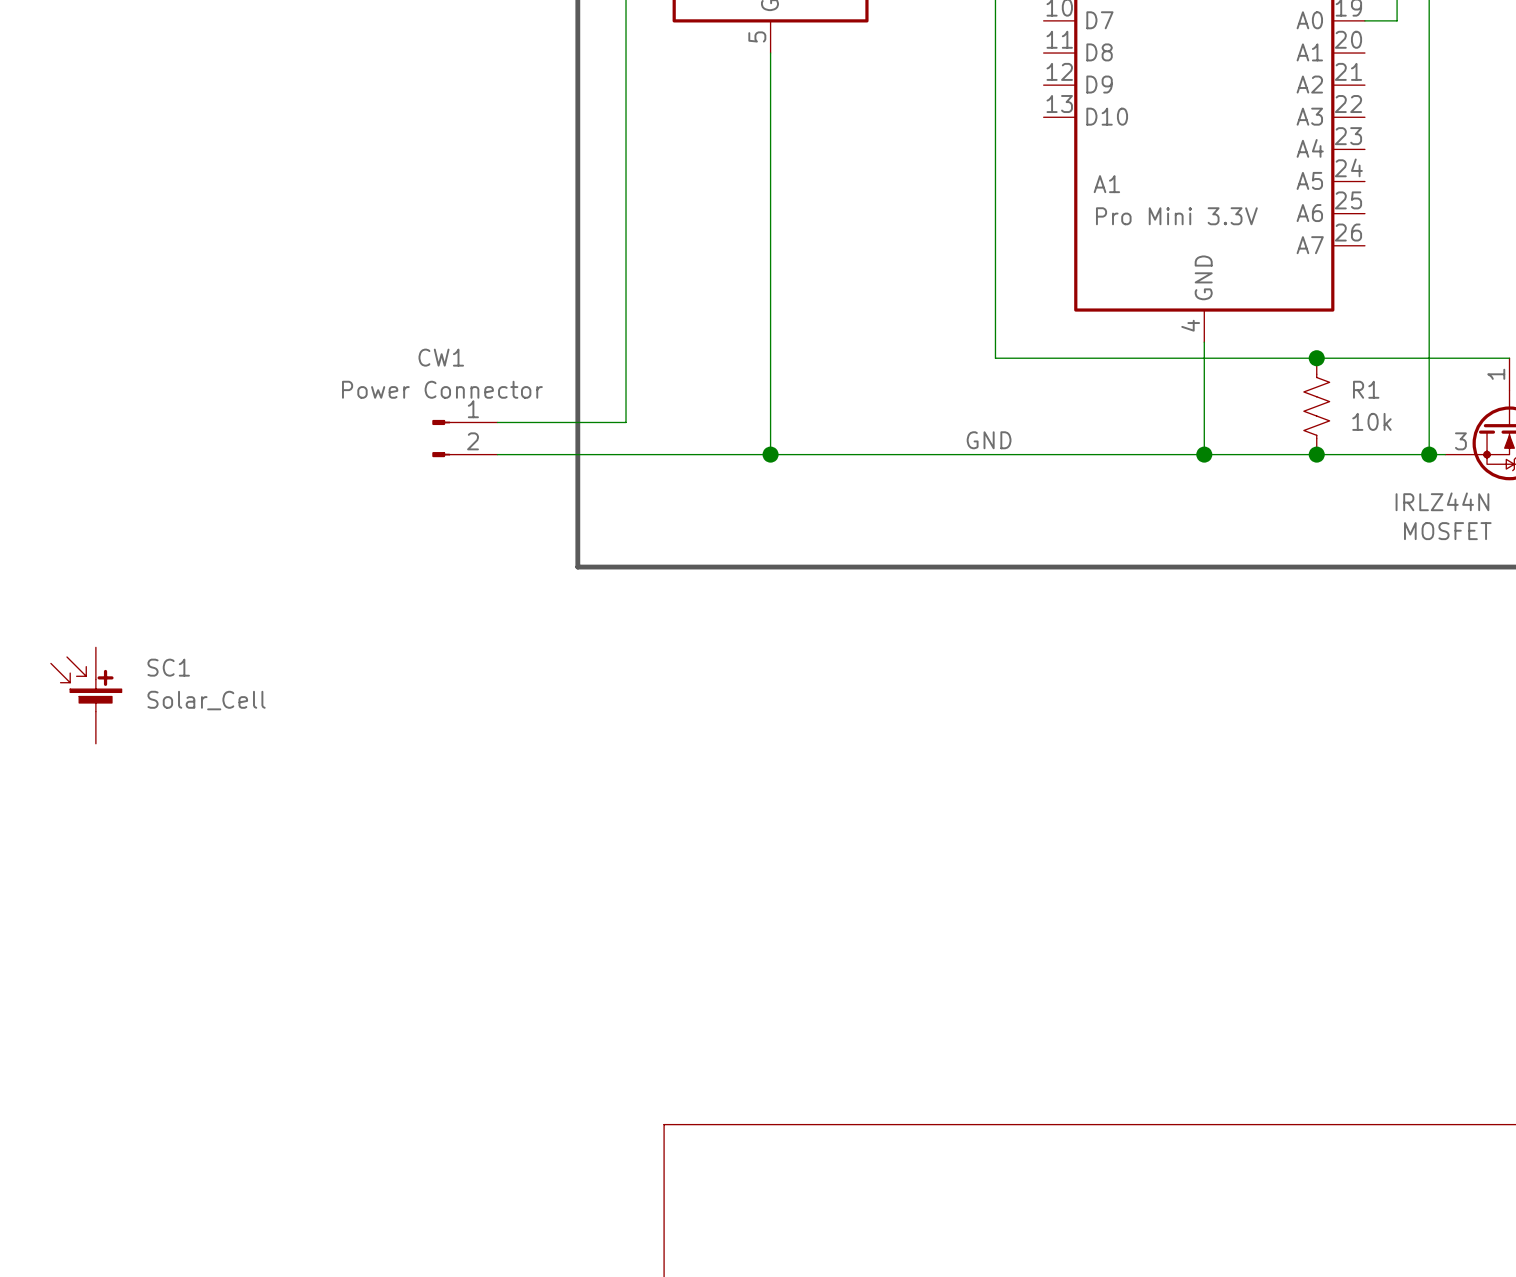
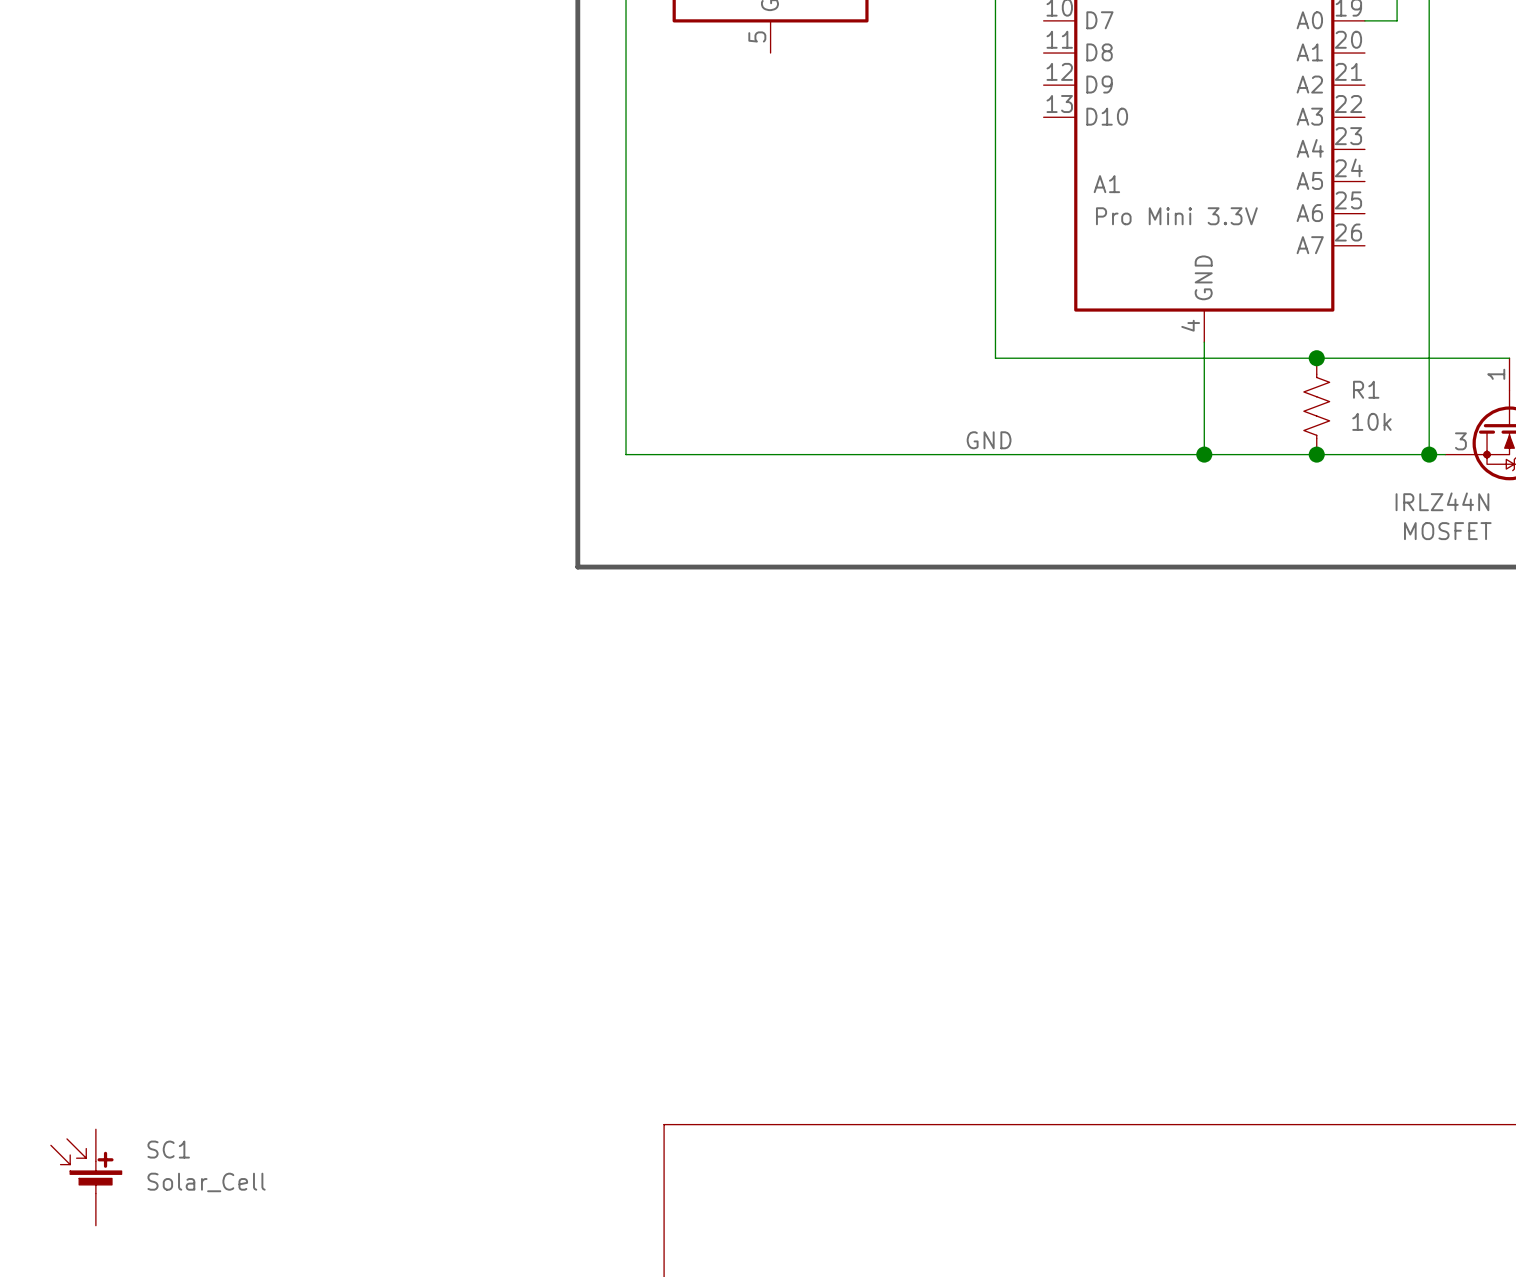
wire: (770, 53) (770, 454) -> none
wire: (497, 422) (626, 422) -> (626, 454) (626, 422)
CW1: Power Connector (464, 438) -> none
wire: (497, 454) (626, 454) -> none
junction: (770, 454) -> none
SC1 position: (86, 695) -> (86, 1177)

